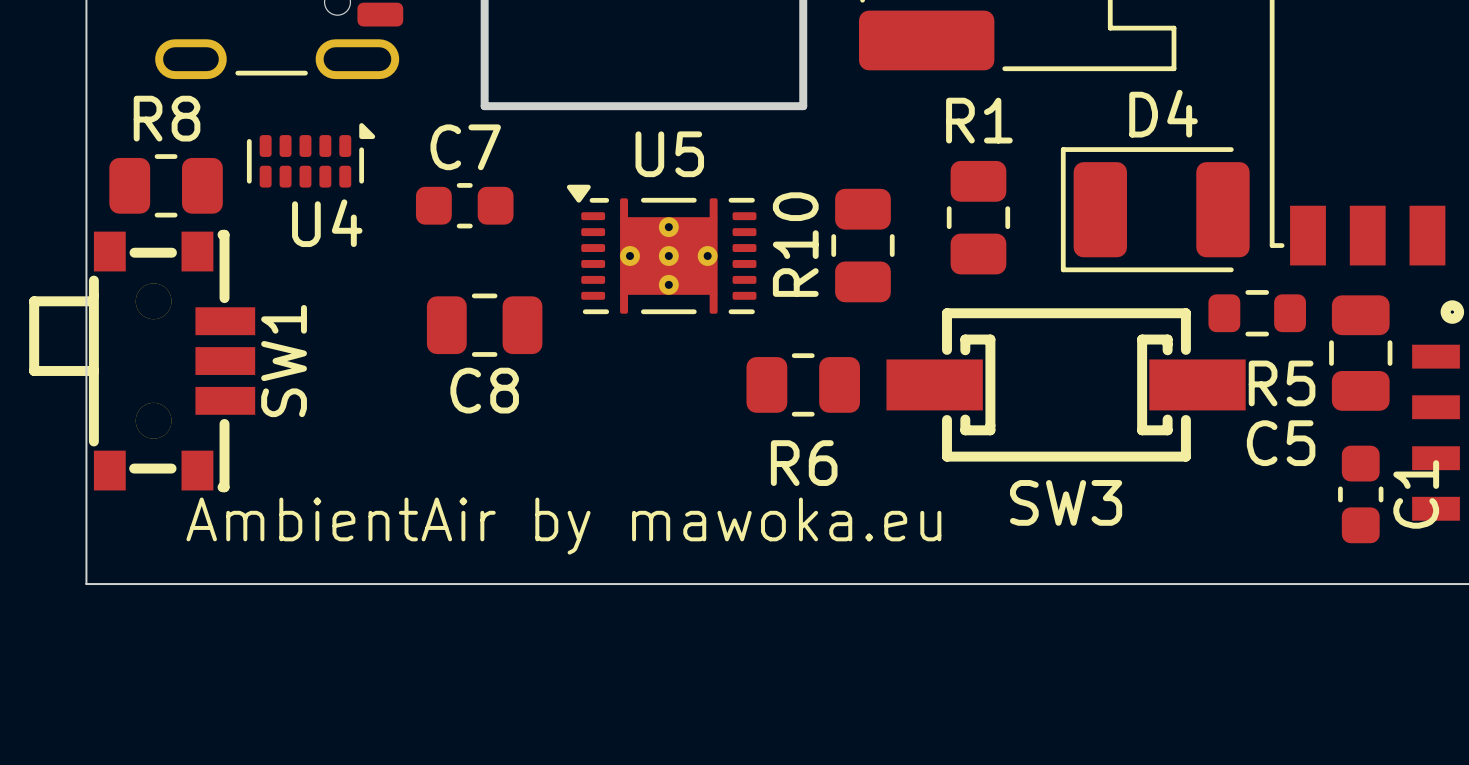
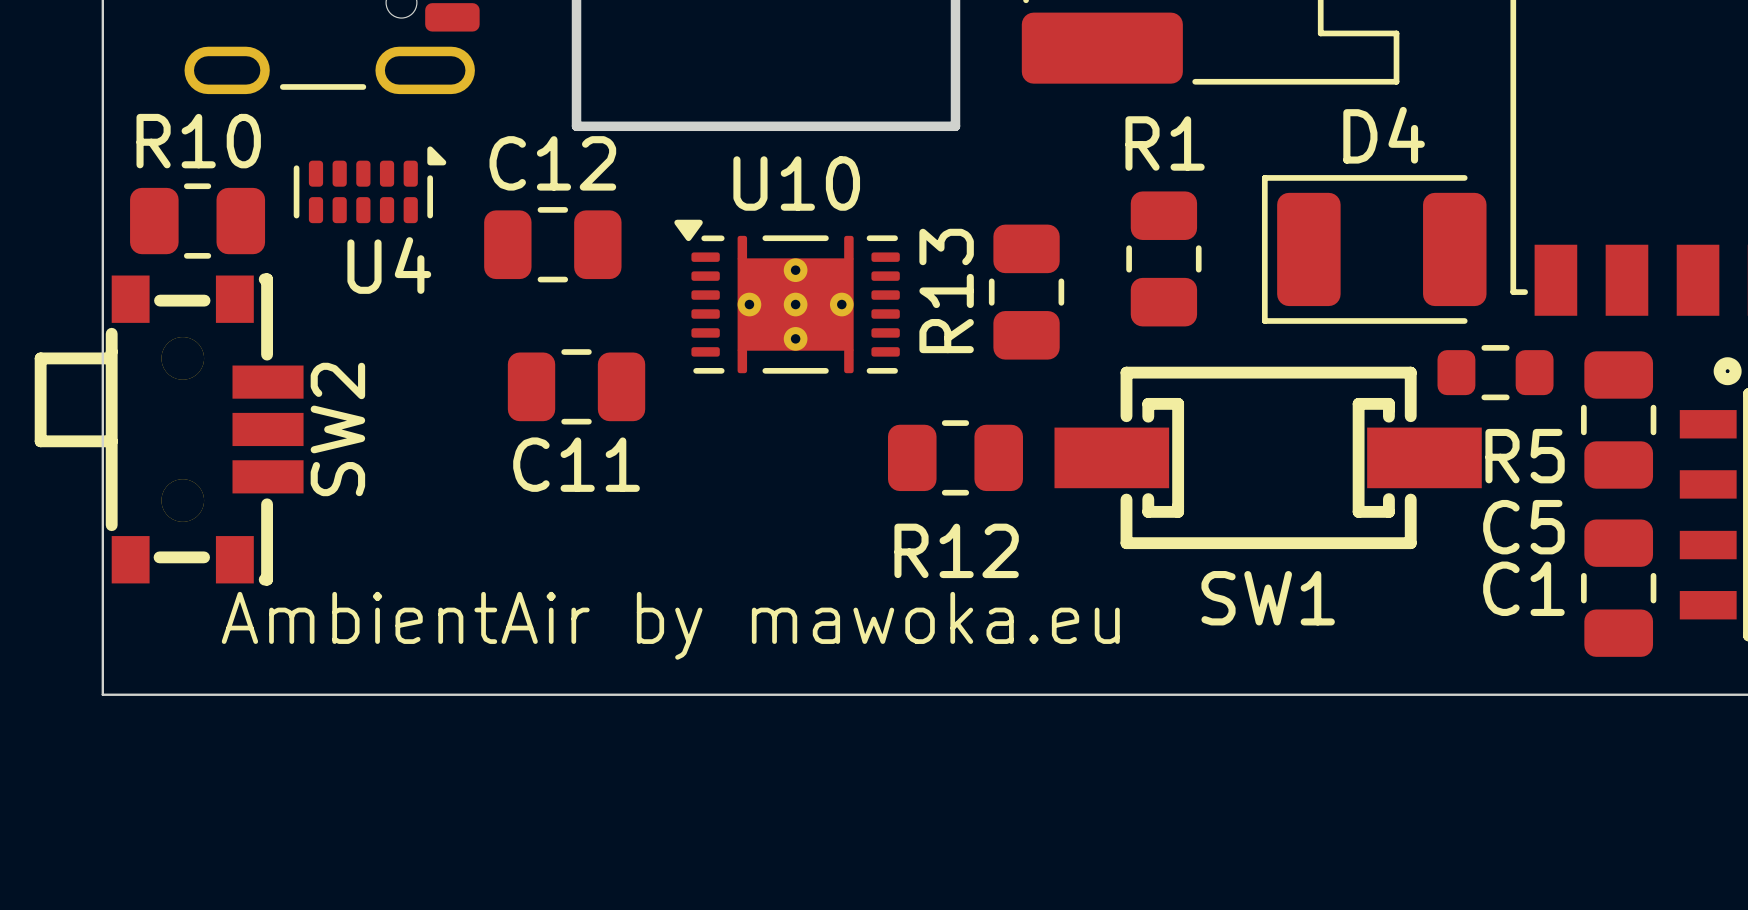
R8 name: R8 (167, 118) -> R10 (198, 141)
U5 name: U5 (669, 154) -> U10 (796, 183)
C7: (464, 205) -> none
C12: none -> (552, 244)
R10 name: R10 (795, 244) -> R13 (946, 290)
SW1 name: SW1 (284, 361) -> SW2 (337, 429)
C8 name: C8 (484, 390) -> C11 (576, 464)
C1 footprint: [1338, 445, 1384, 544] -> [1581, 519, 1657, 657]
R6 name: R6 (804, 463) -> R12 (956, 550)
C1 name rotation: 0° (1416, 494) -> 90° clockwise (1523, 588)
C1 name position: C1 (1416, 494) -> C1 (1523, 588)
SW3 name: SW3 (1066, 502) -> SW1 (1268, 598)

